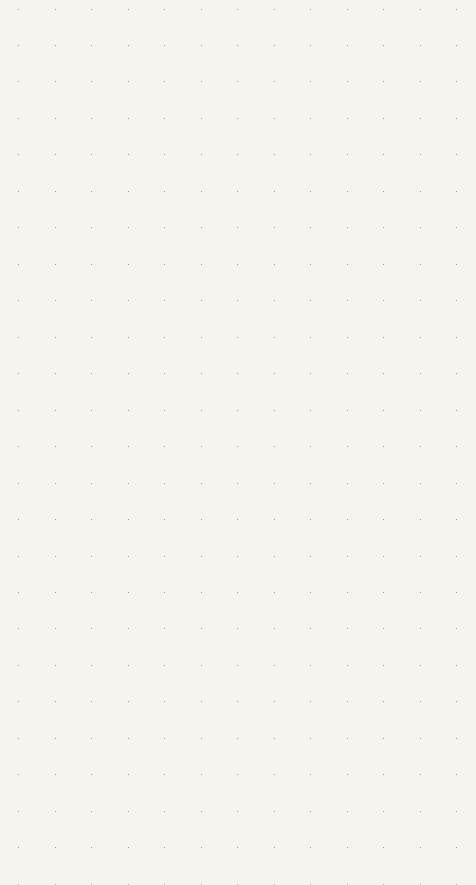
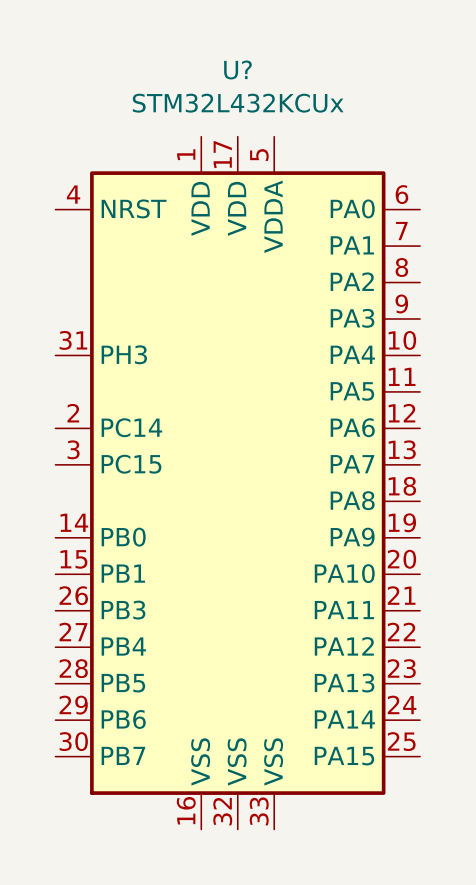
U?: none -> STM32L432KCUx (237, 483)

